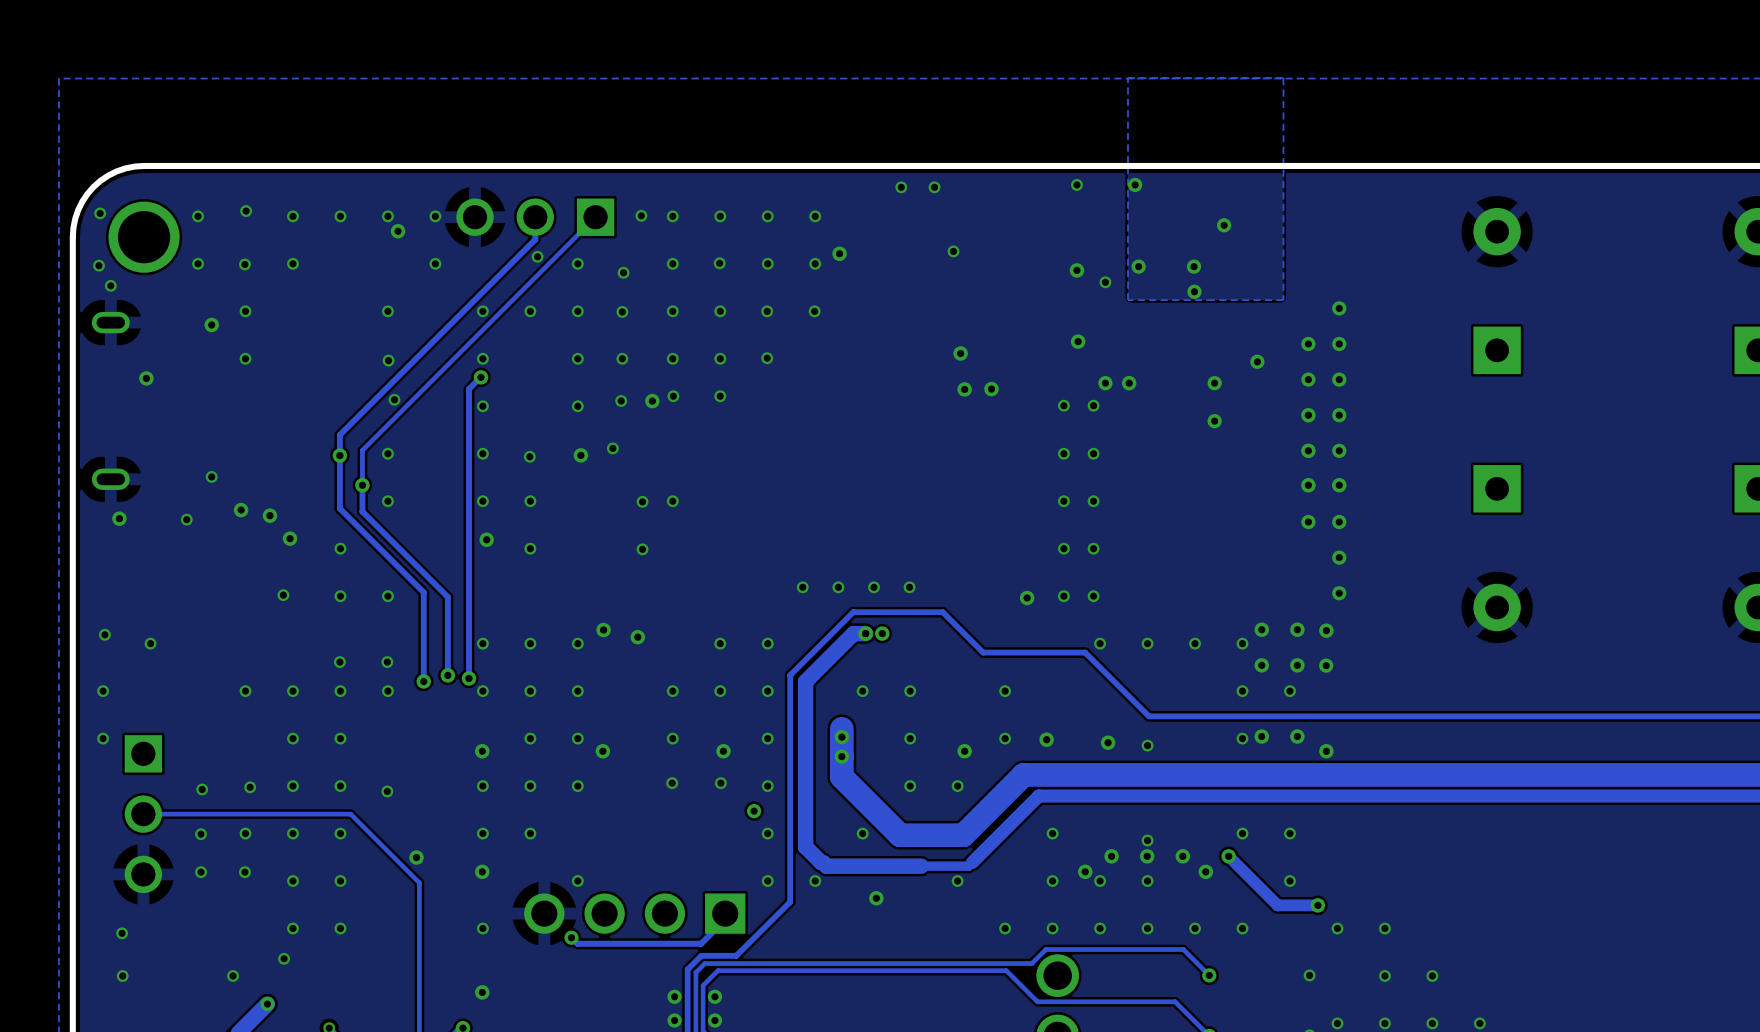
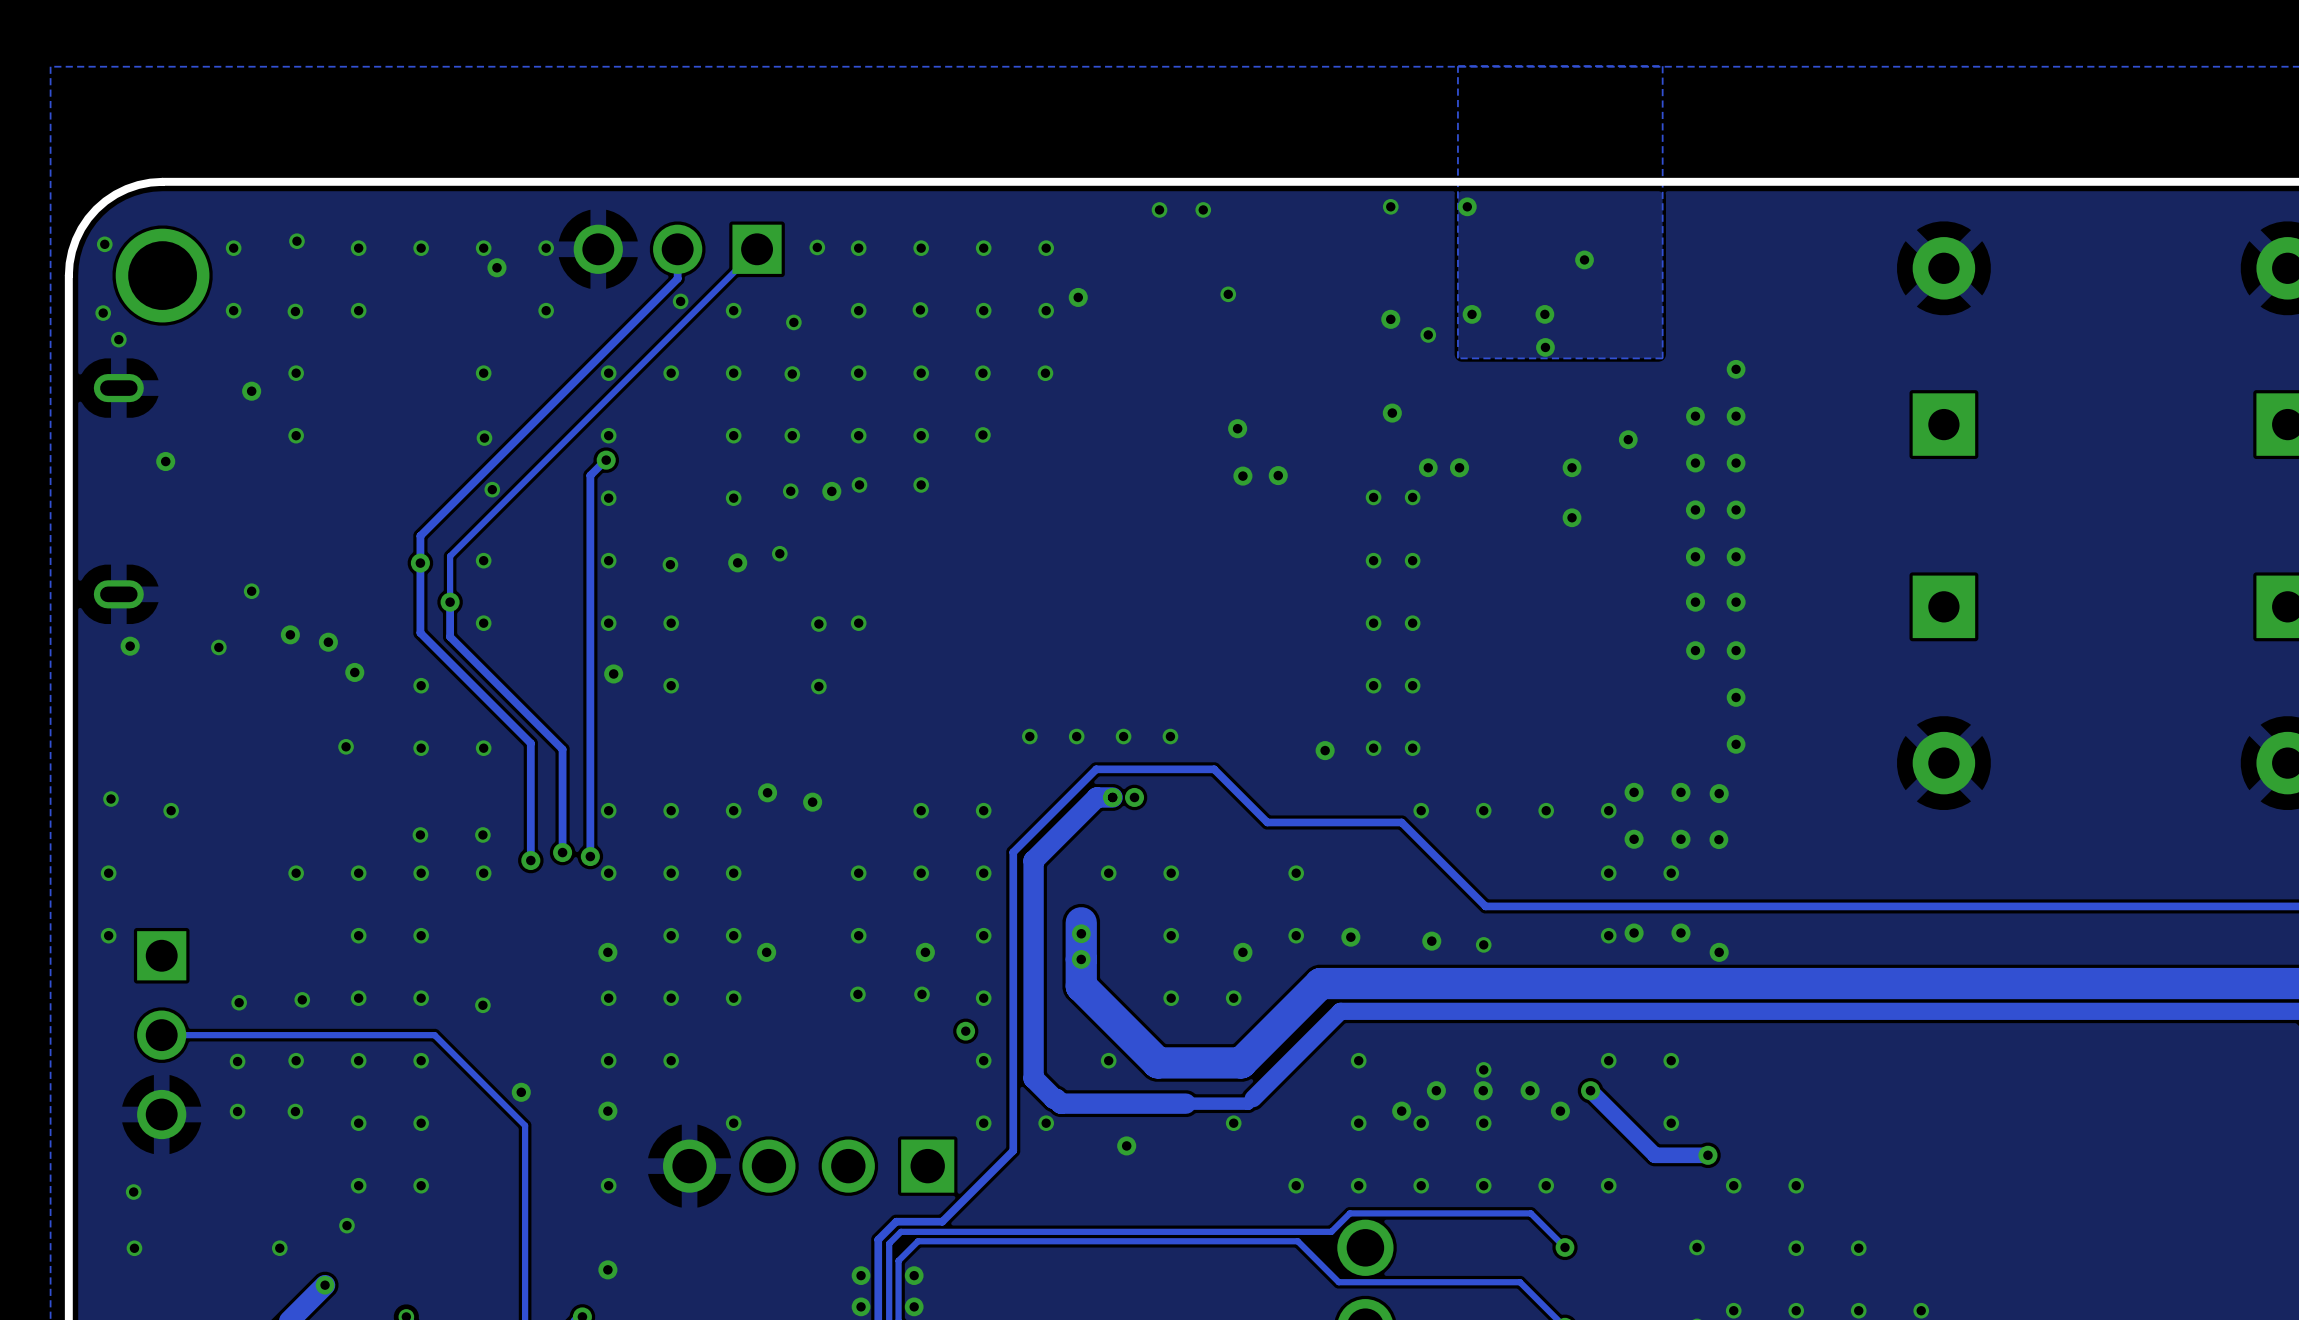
track: (725, 913) (725, 919) (701, 943) (577, 943) (571, 937) -> none
via: (571, 937) -> none

